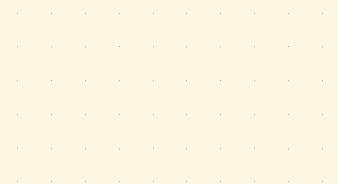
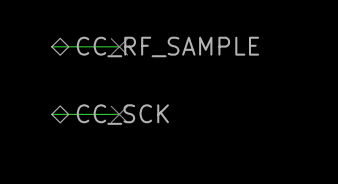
wire: none -> (51, 46) (119, 46)
no-connect mark: none -> (119, 46)
hierarchical label: none -> CC_RF_SAMPLE (167, 46)
wire: none -> (51, 114) (119, 114)
no-connect mark: none -> (119, 114)
hierarchical label: none -> CC_SCK (122, 114)

